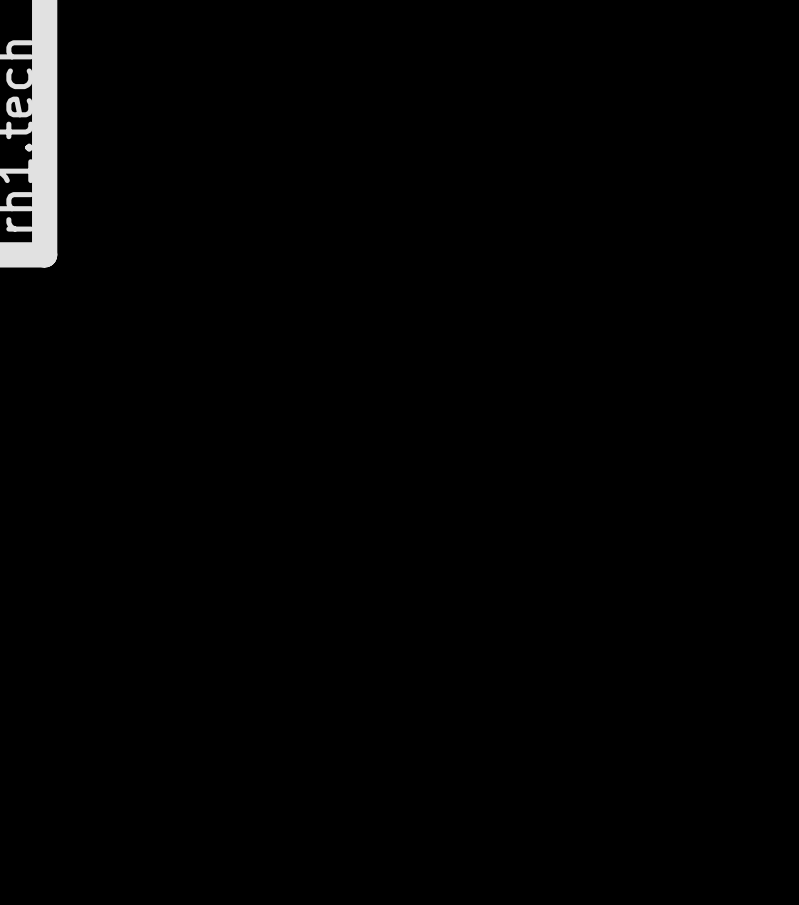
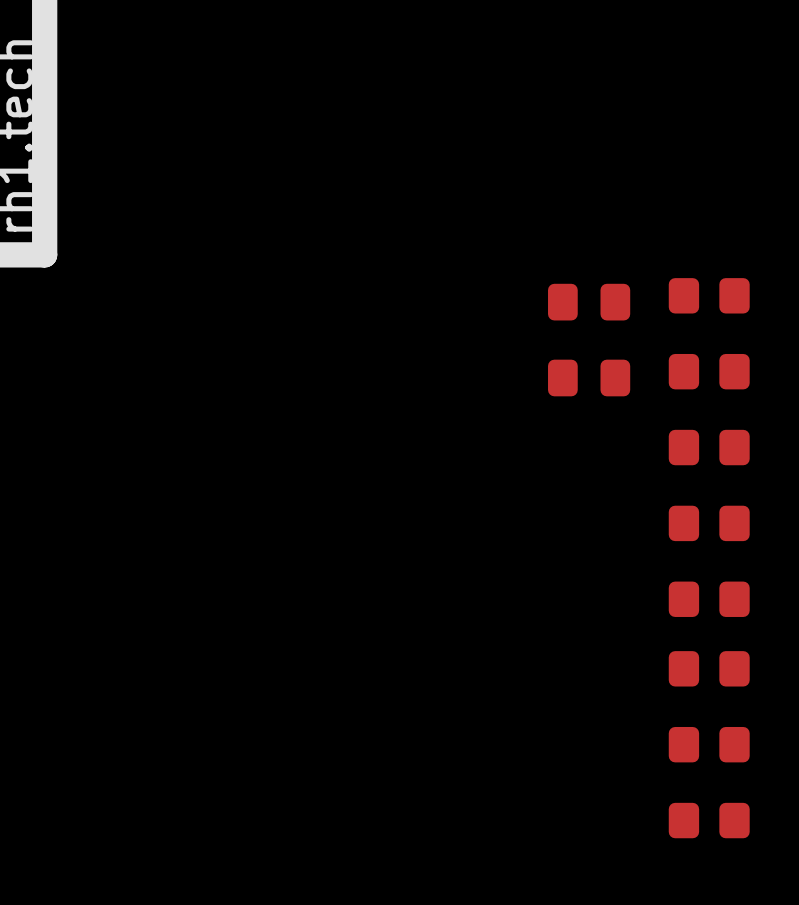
part: none -> (709, 295)
part: none -> (589, 302)
part: none -> (709, 371)
part: none -> (589, 378)
part: none -> (709, 447)
part: none -> (709, 523)
part: none -> (709, 599)
part: none -> (709, 668)
part: none -> (709, 744)
part: none -> (709, 820)

